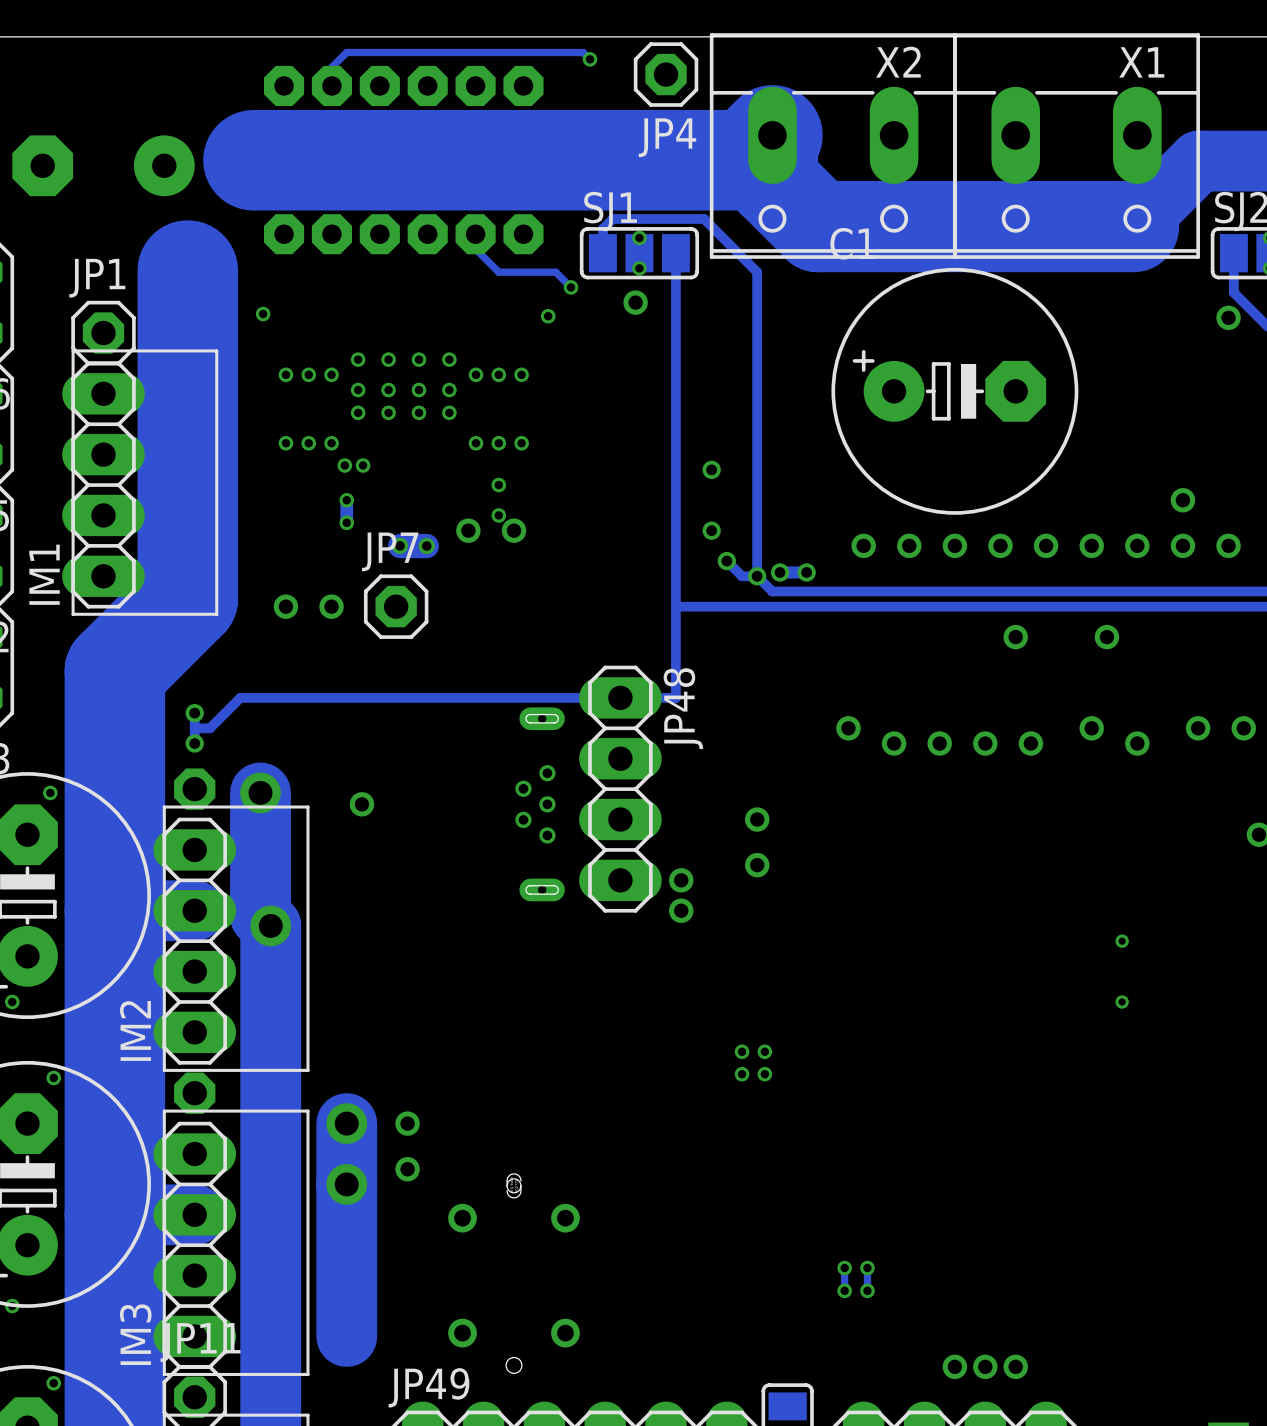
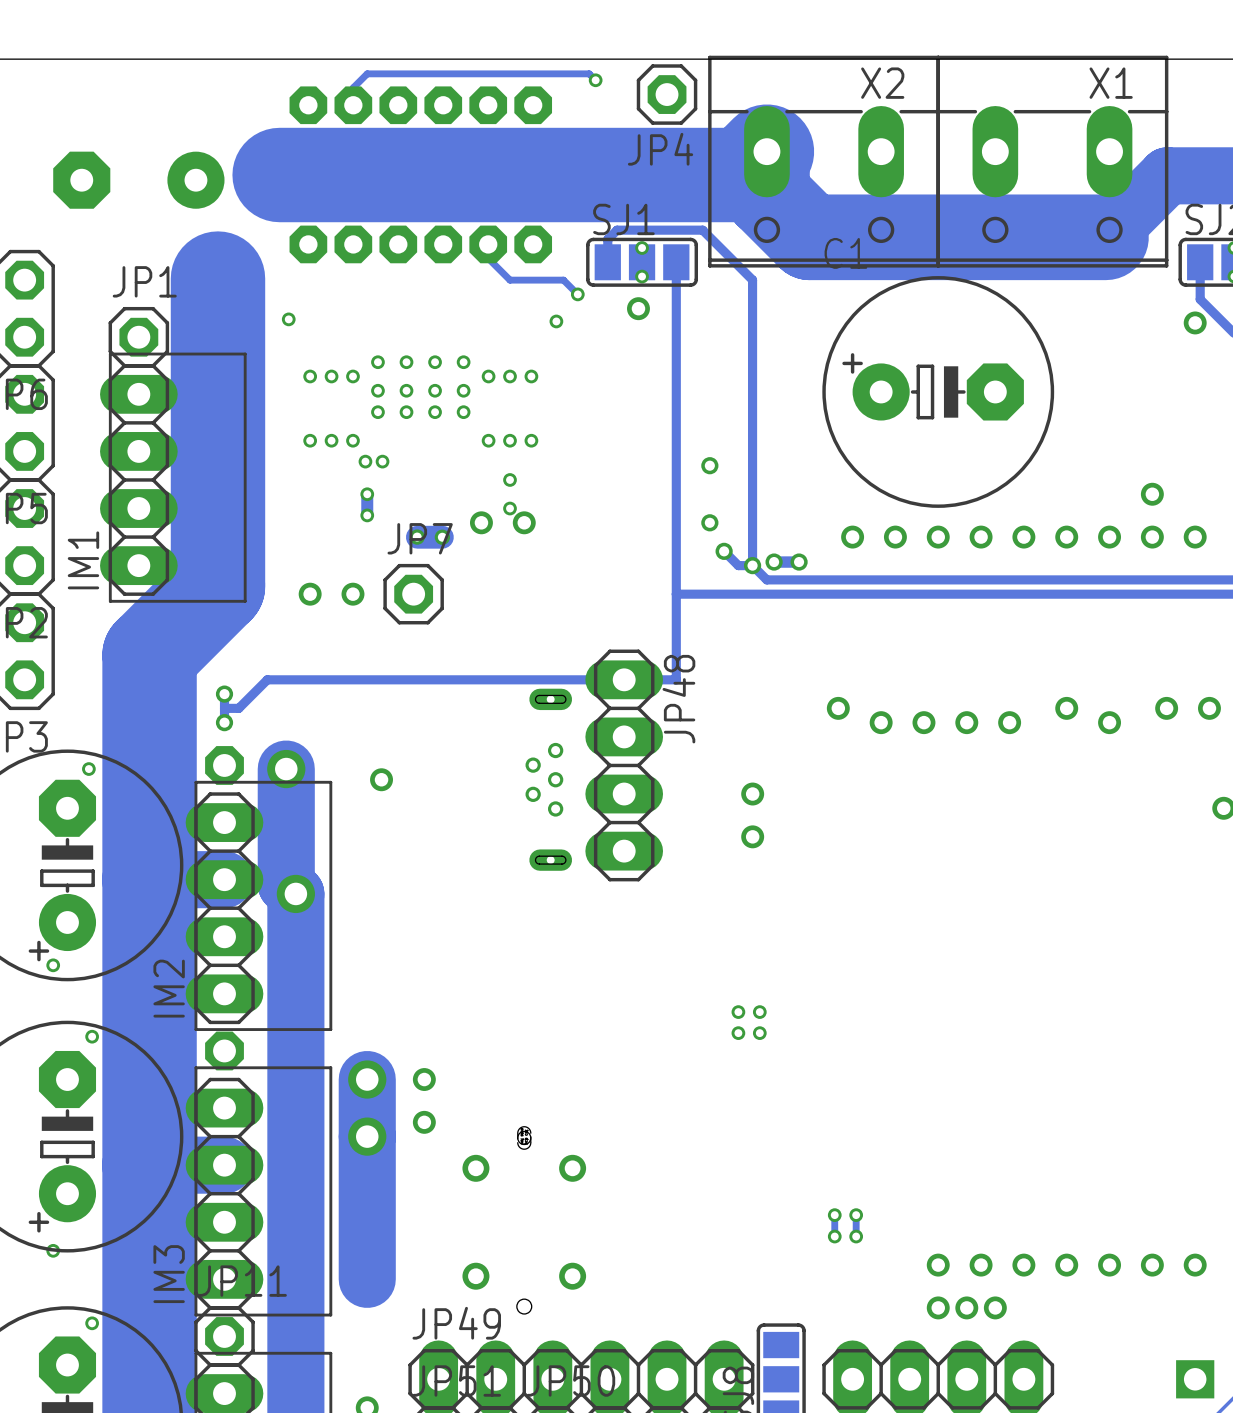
part: (1015, 637) -> none
part: (1106, 637) -> none
part: (681, 880) -> none
part: (681, 910) -> none
via: (1122, 941) -> none
via: (1122, 1001) -> none
part: none -> (938, 1265)
part: none -> (981, 1265)
part: none -> (1023, 1265)
part: none -> (1066, 1265)
part: none -> (1109, 1265)
part: none -> (1152, 1265)
part: none -> (1195, 1265)

